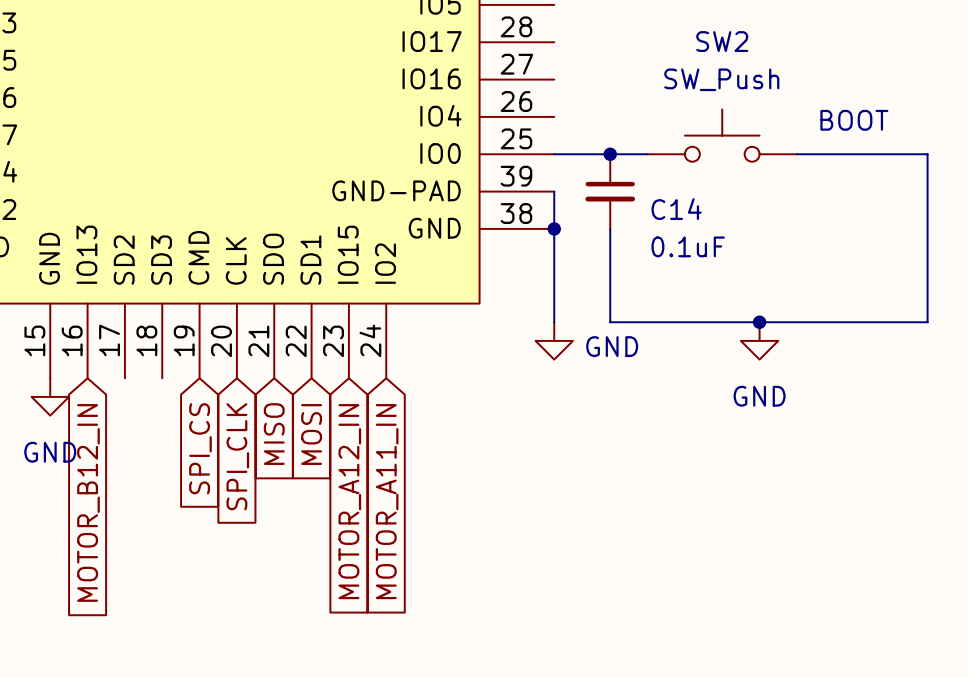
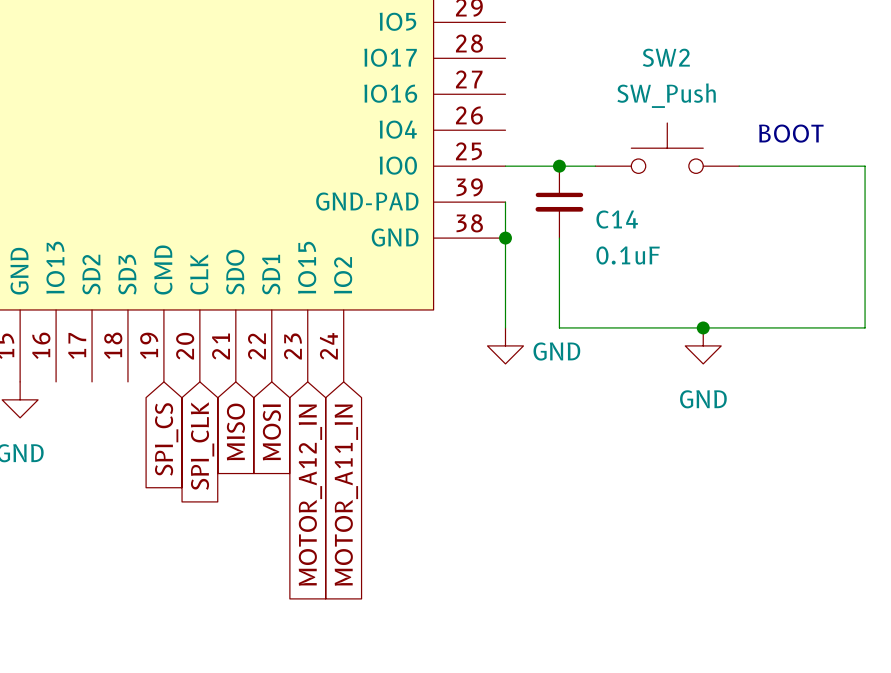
global label: MOTOR_B12_IN (88, 502) -> none

